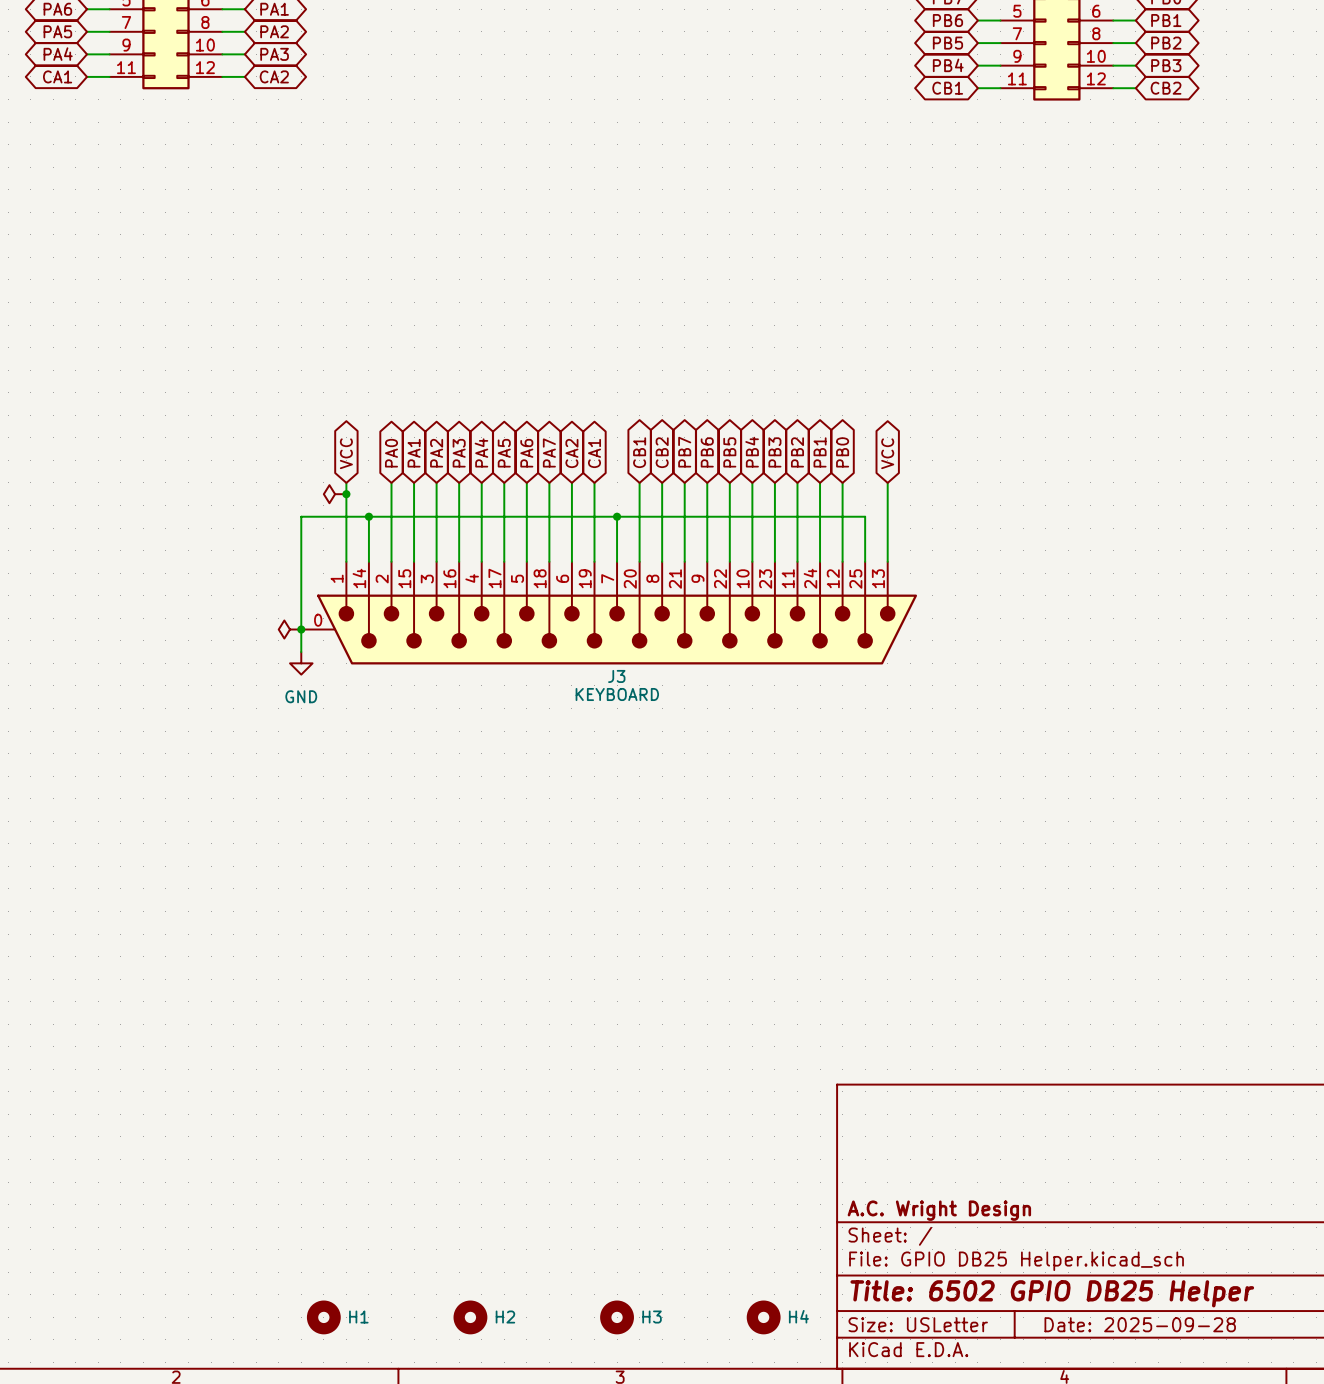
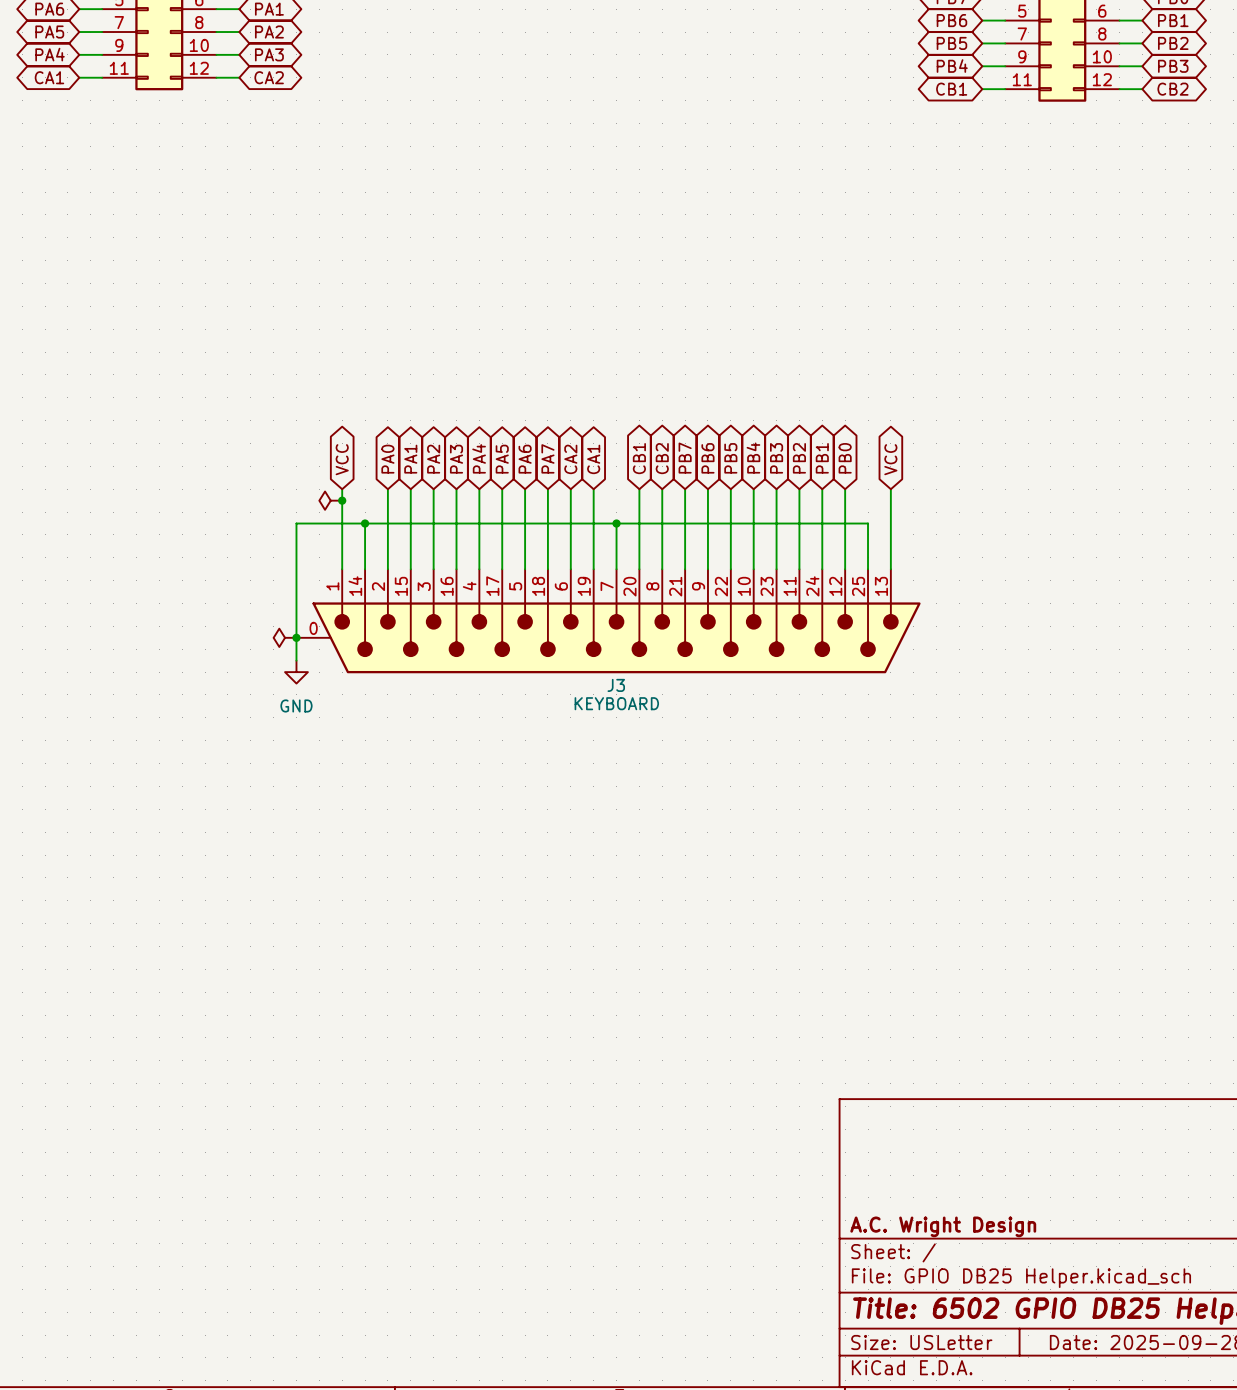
H1: (323, 1317) -> none
H2: (470, 1317) -> none
H3: (617, 1317) -> none
H4: (763, 1317) -> none

